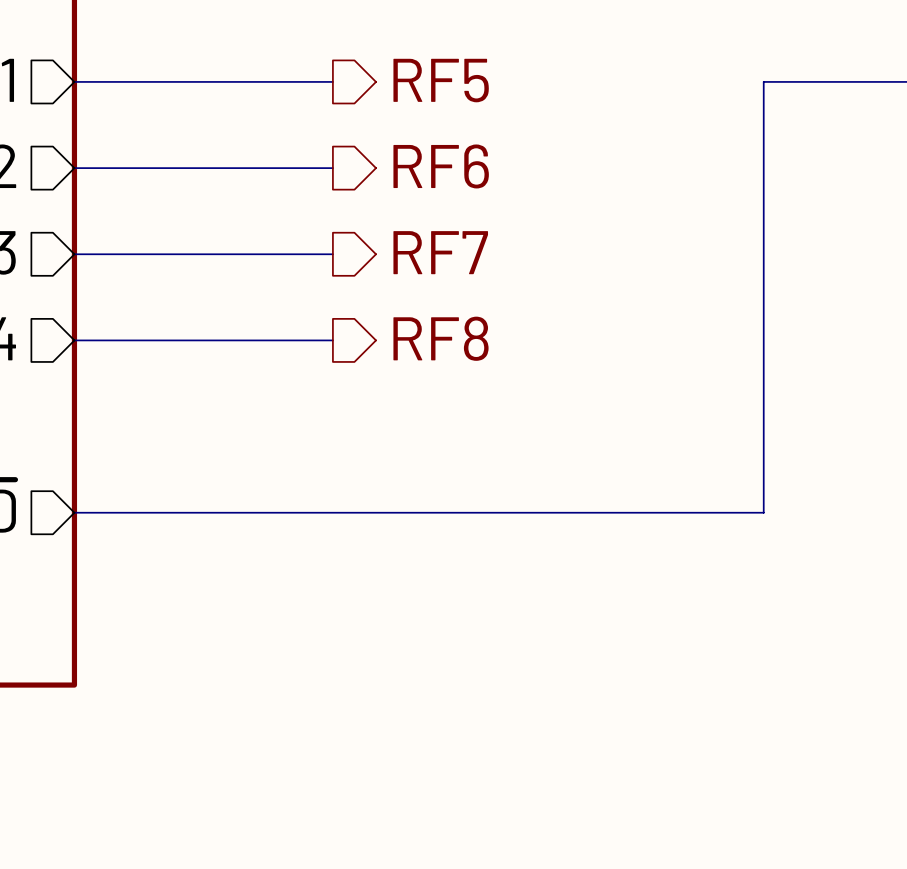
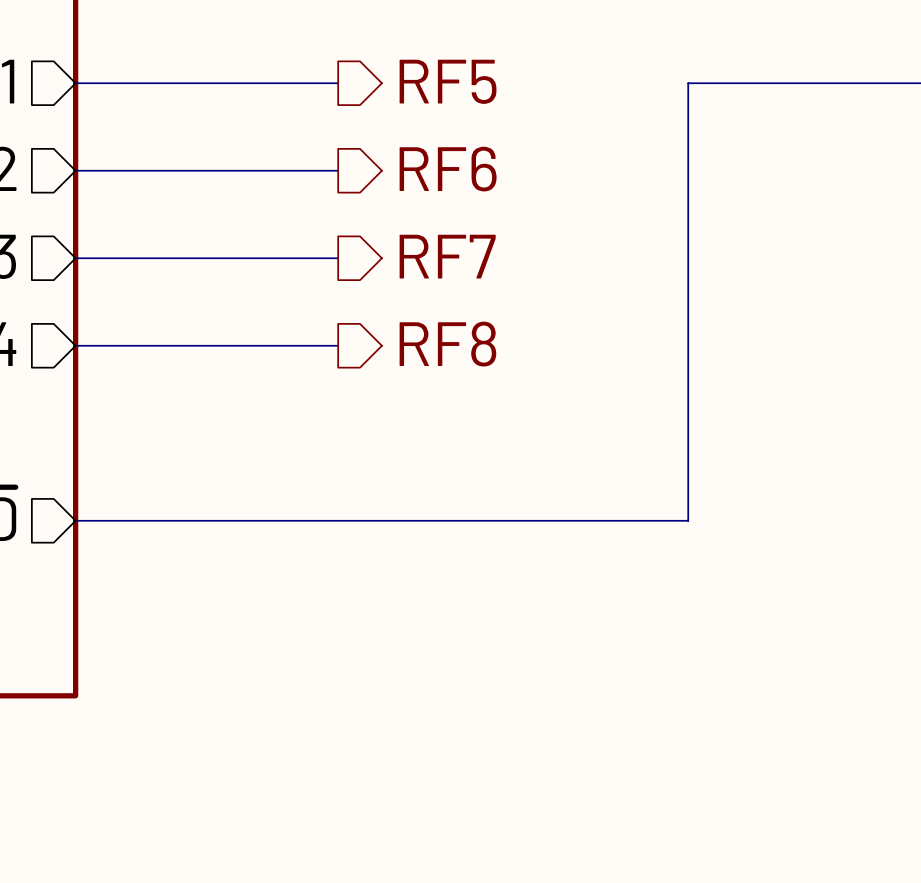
wire: (763, 81) (763, 512) (677, 512) -> (775, 83) (688, 83) (688, 520)

